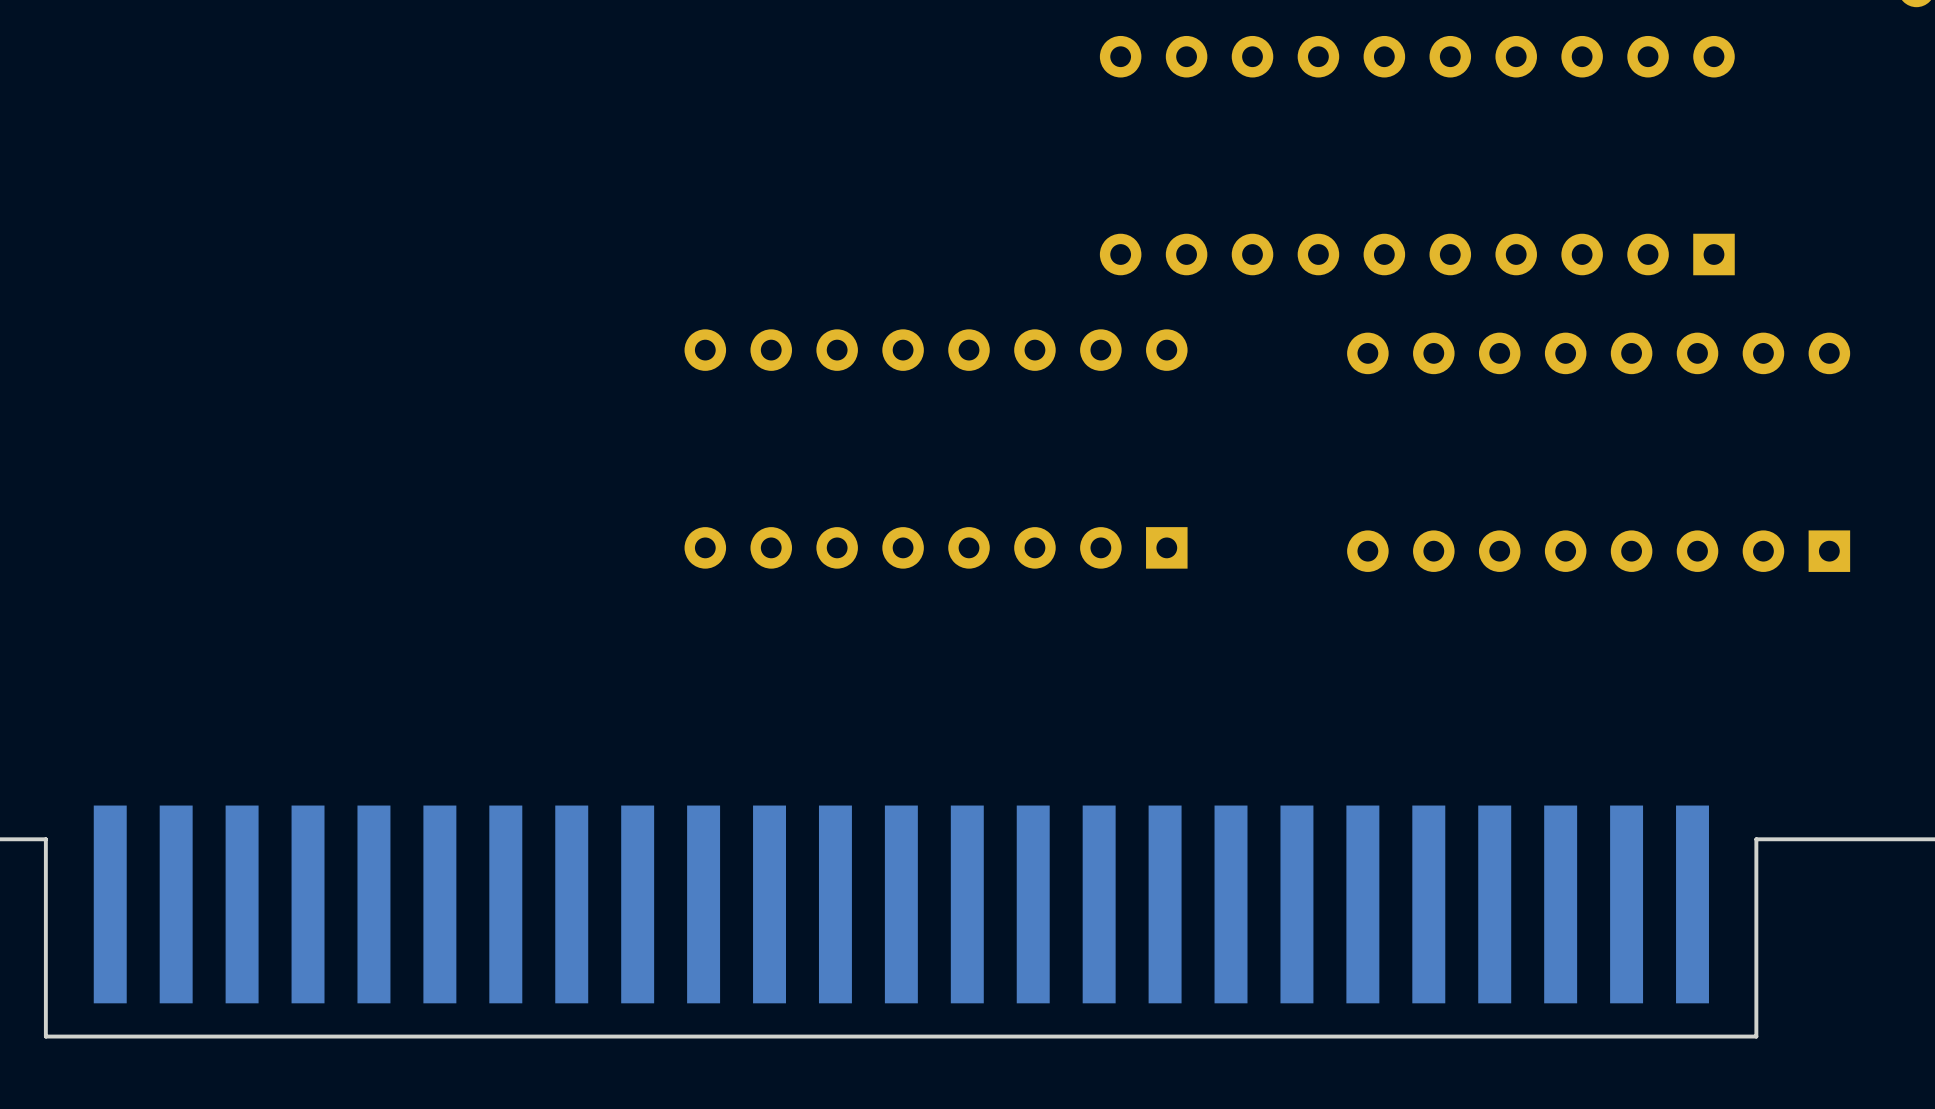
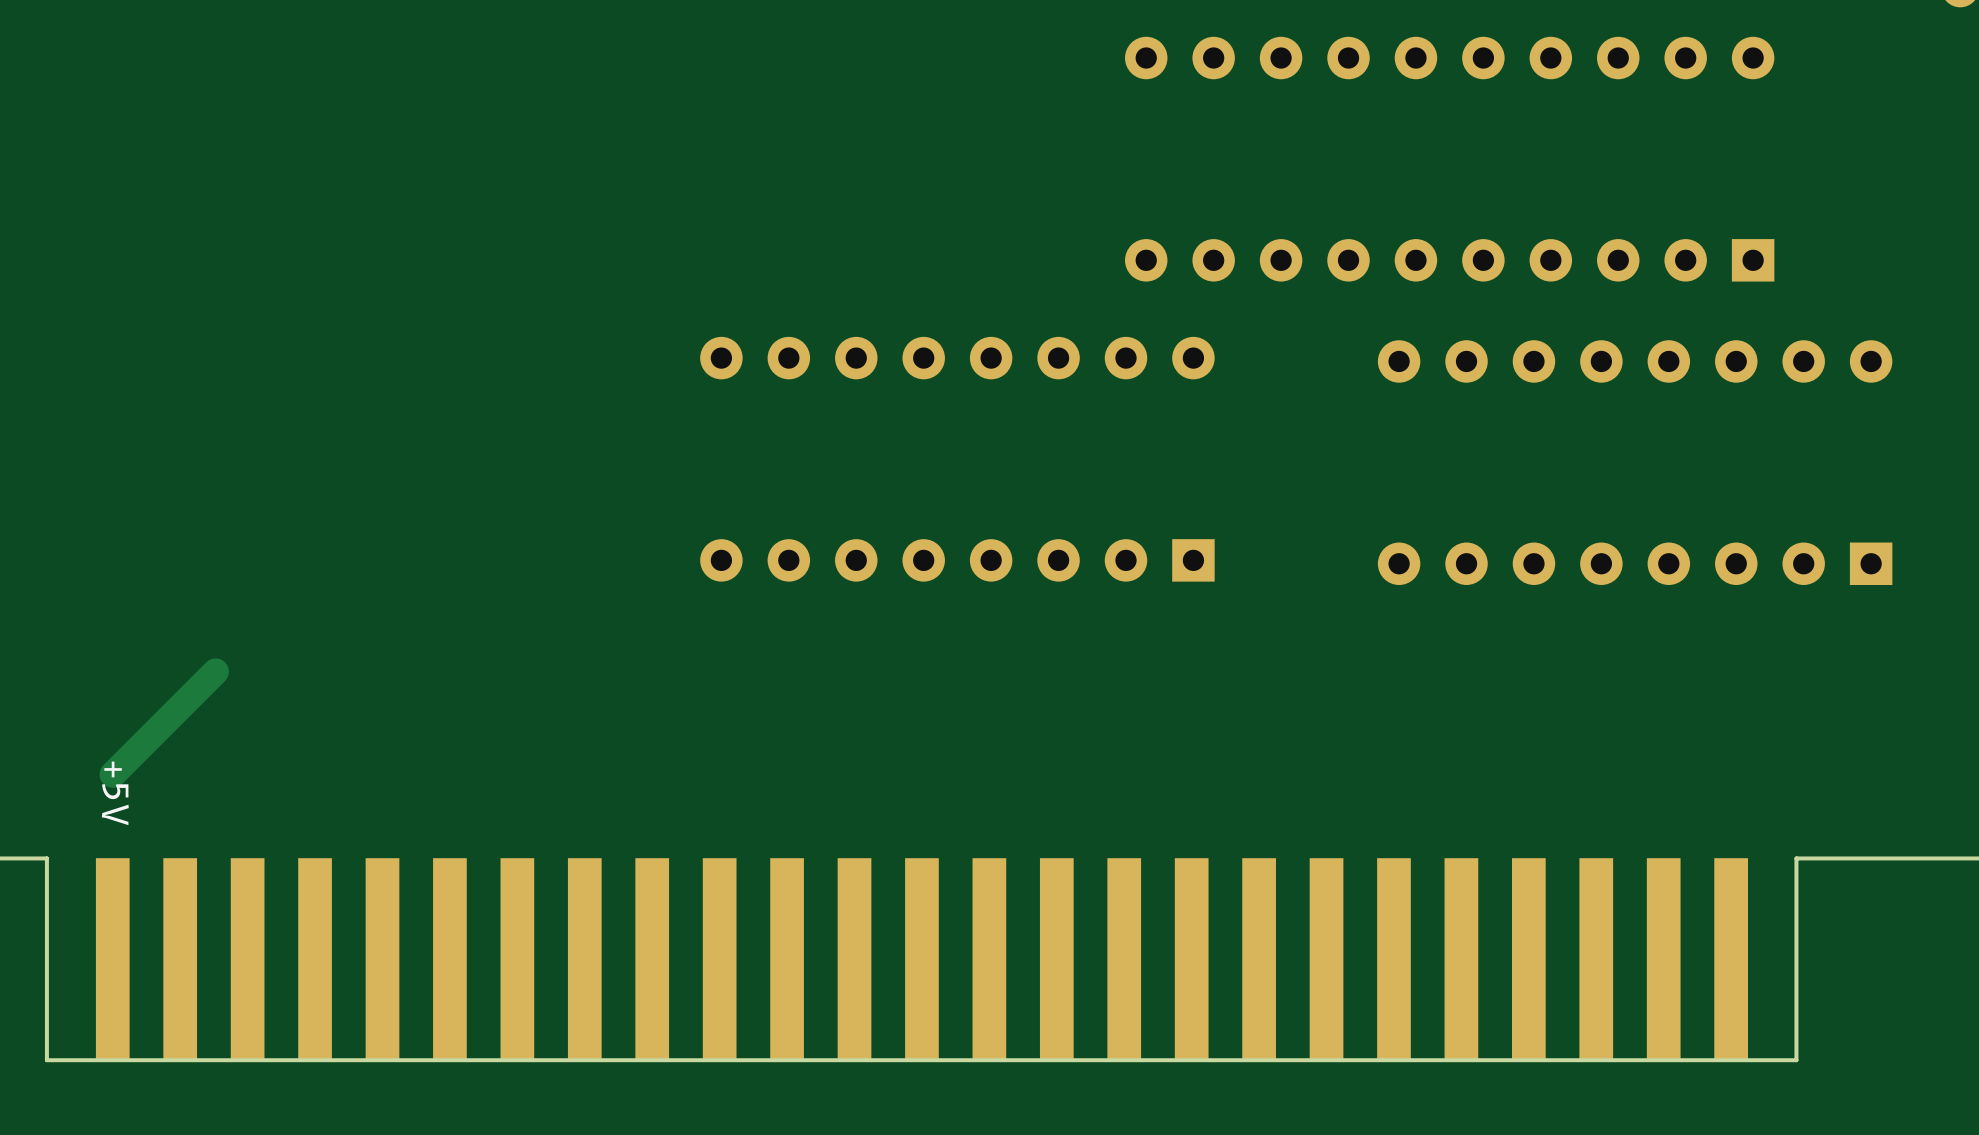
track: none -> (215, 671) (112, 774)
text: none -> +5V (115, 793)
part position: (901, 904) -> (921, 959)

